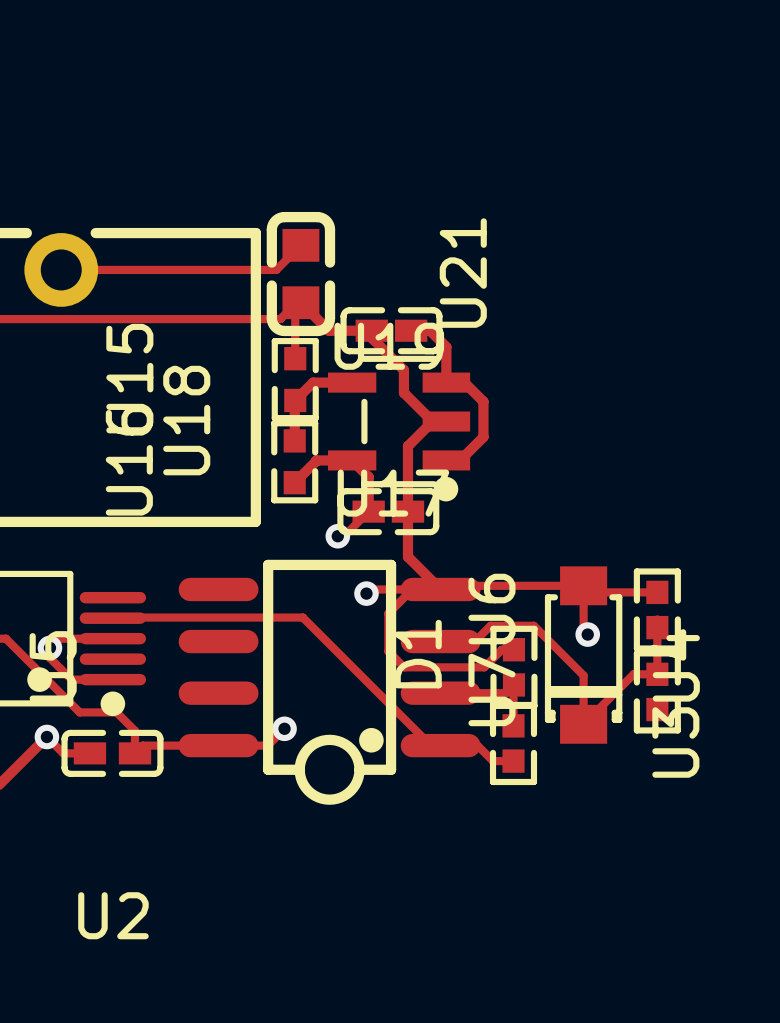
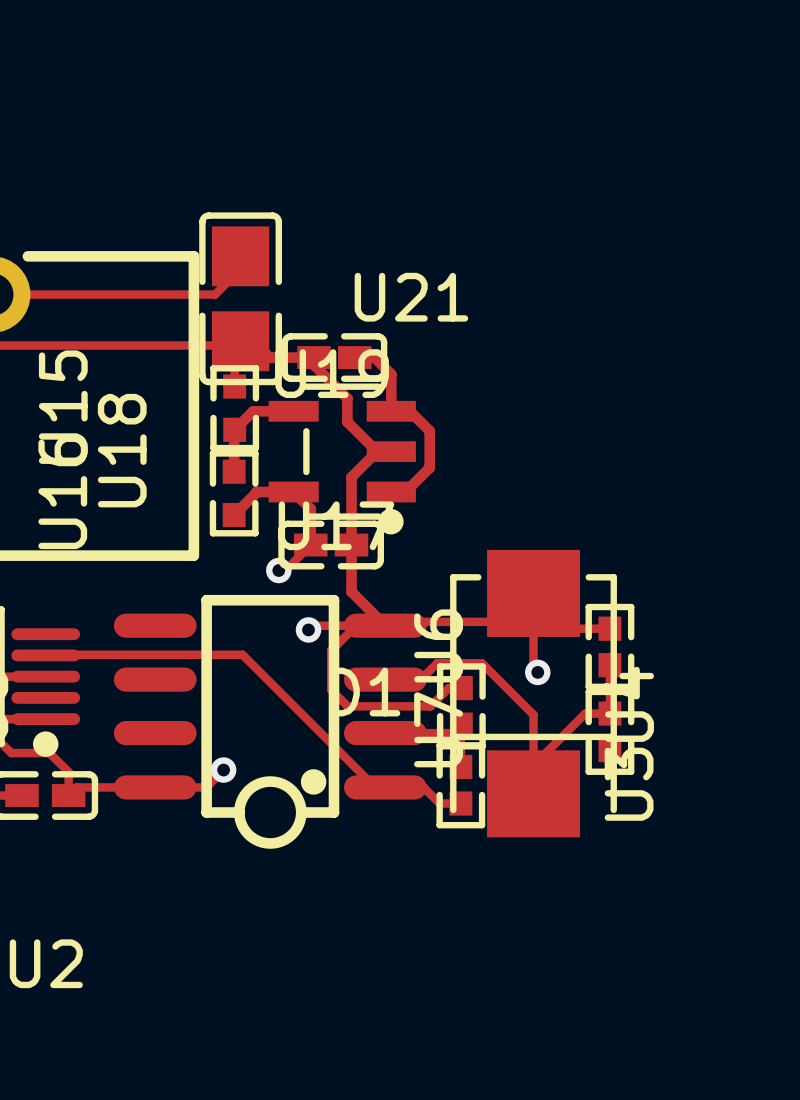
U21 footprint: [266, 211, 336, 337] -> [199, 212, 282, 386]
U21 name rotation: 0° (463, 273) -> 90° clockwise (411, 297)
D1 footprint: [544, 566, 623, 744] -> [450, 549, 617, 838]

